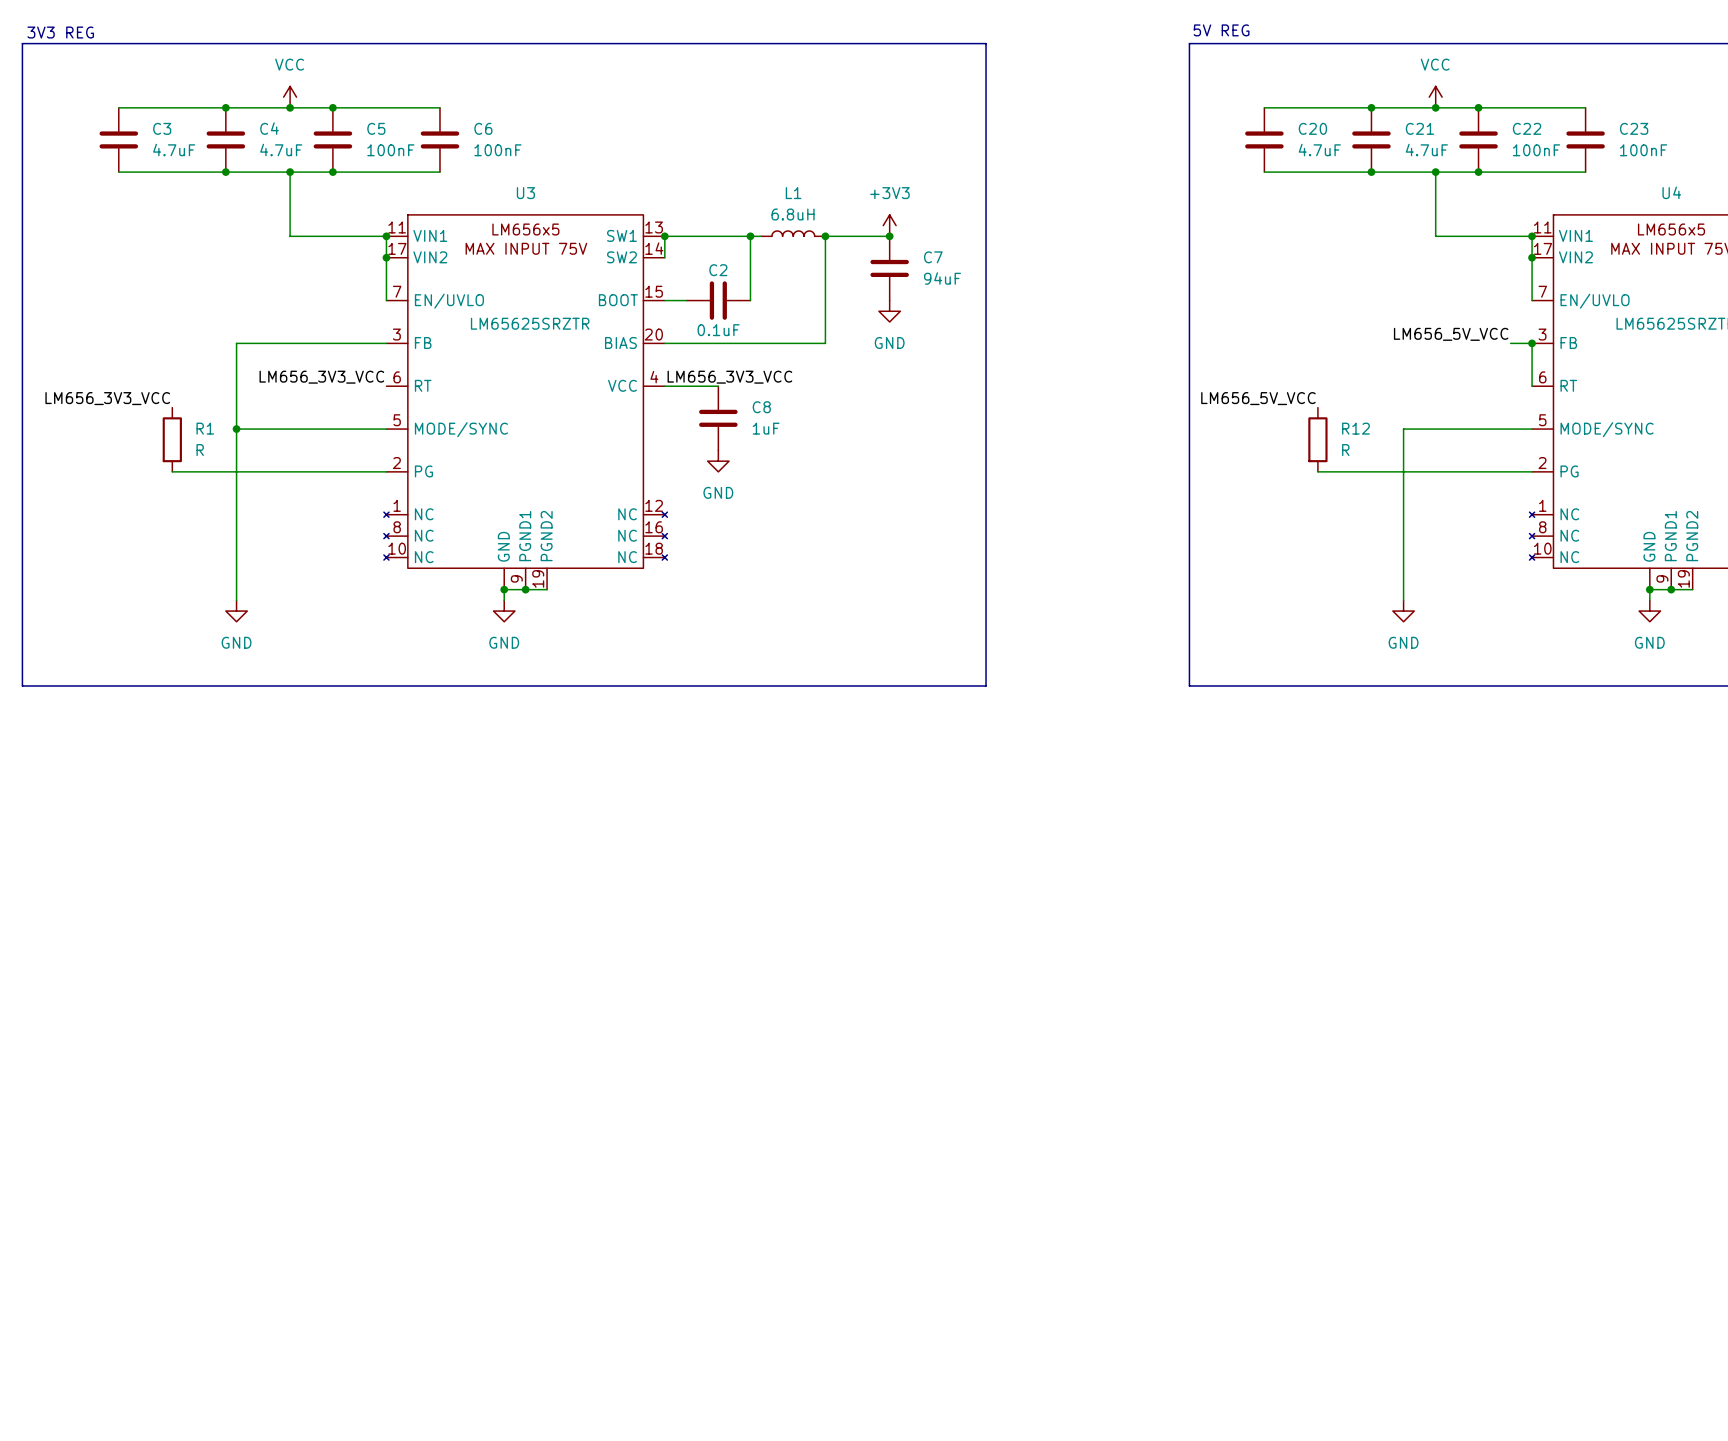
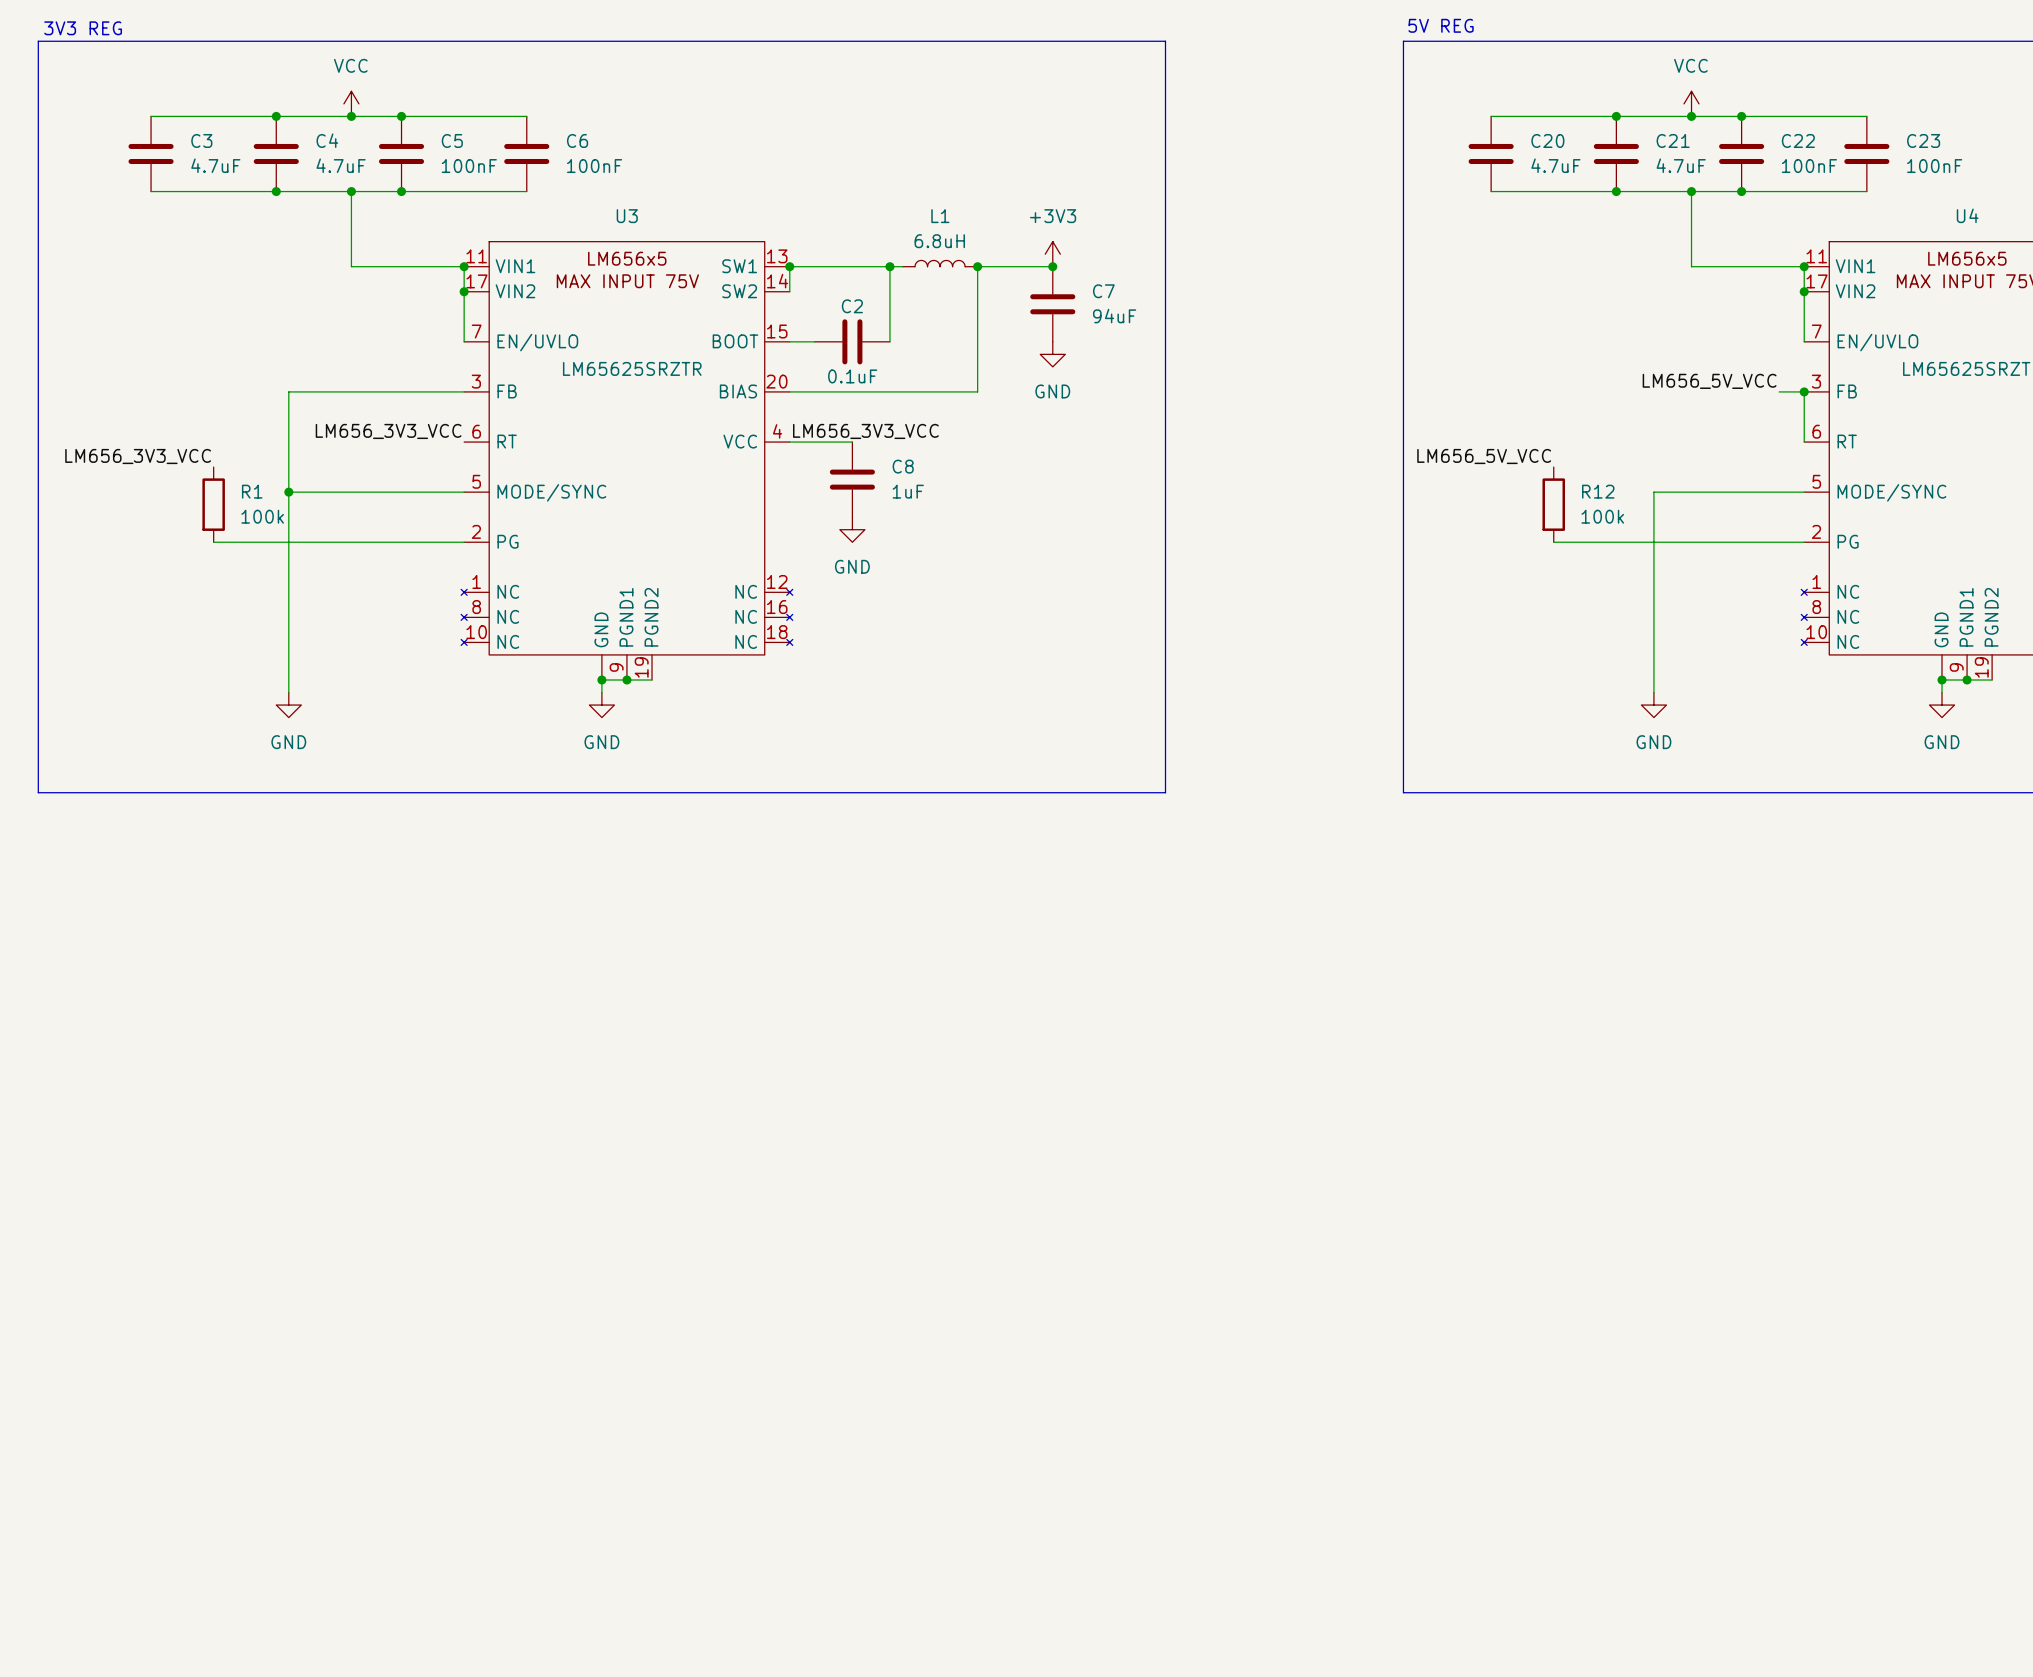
R1 value: R (200, 450) -> 100k (262, 516)
R12 value: R (1345, 450) -> 100k (1602, 516)

